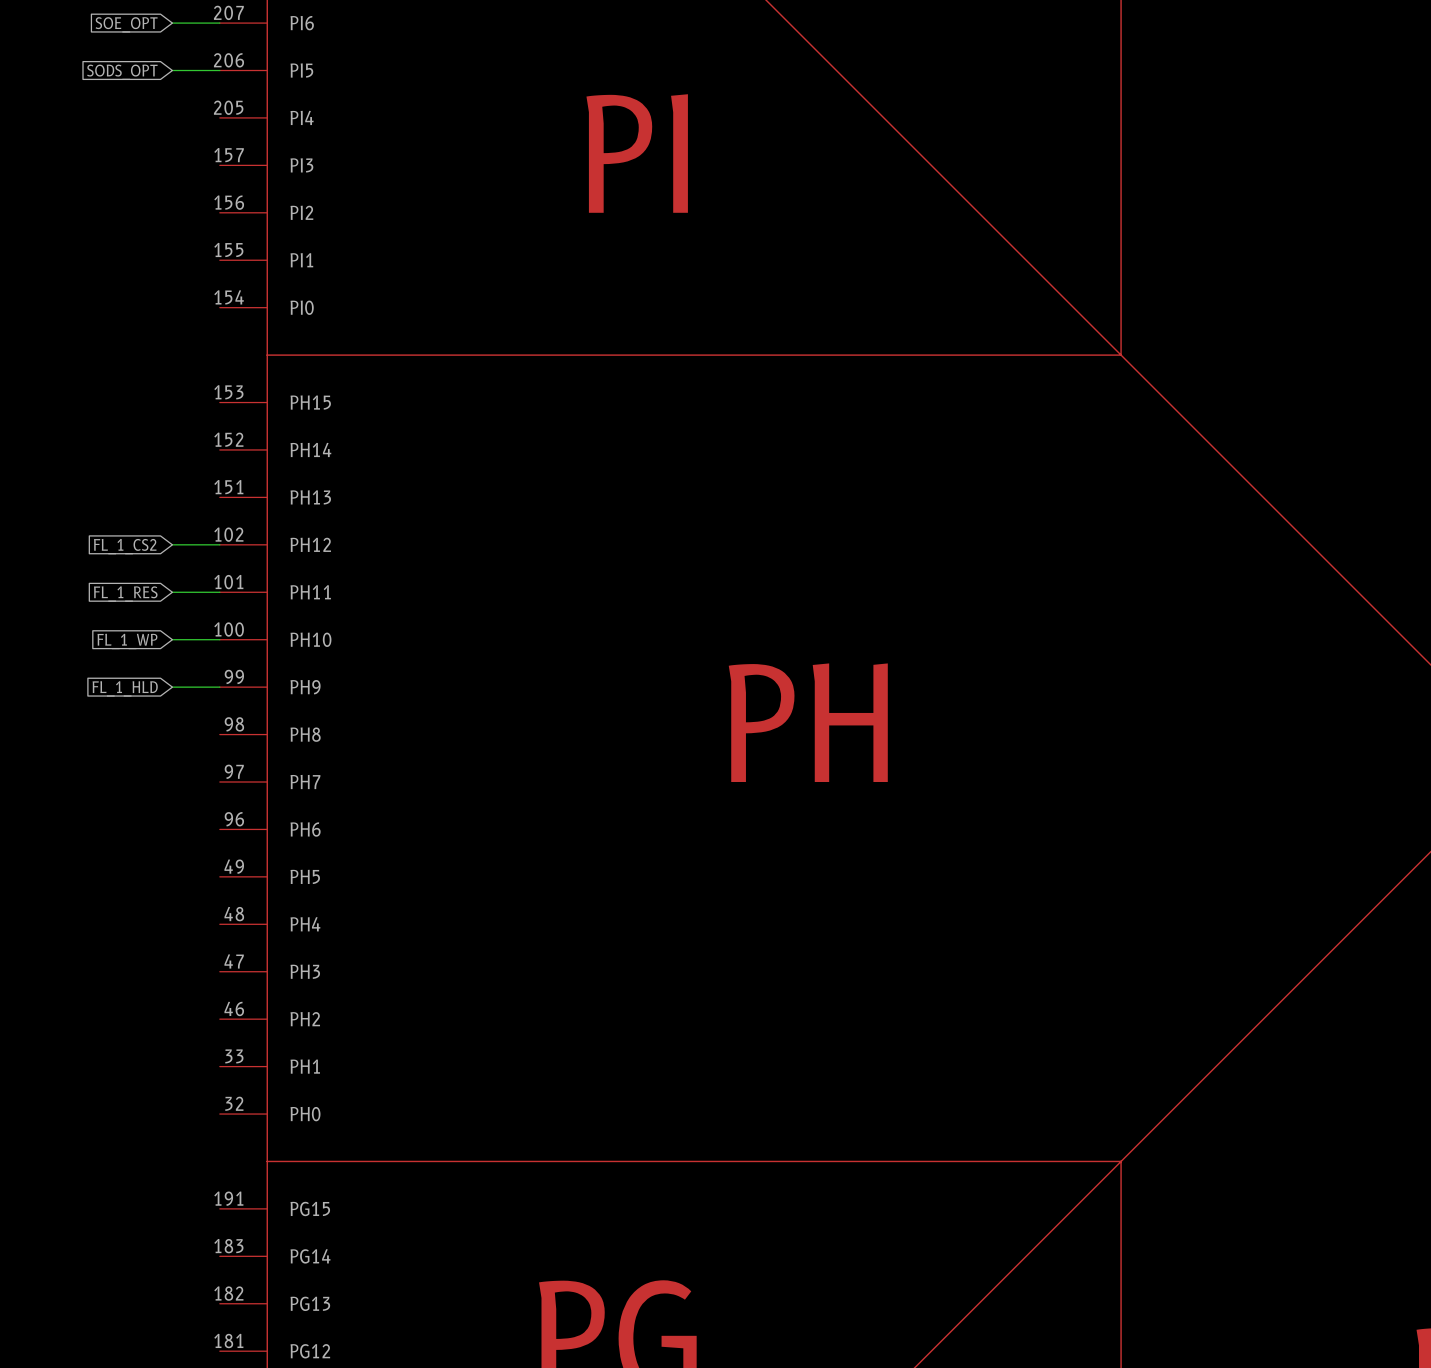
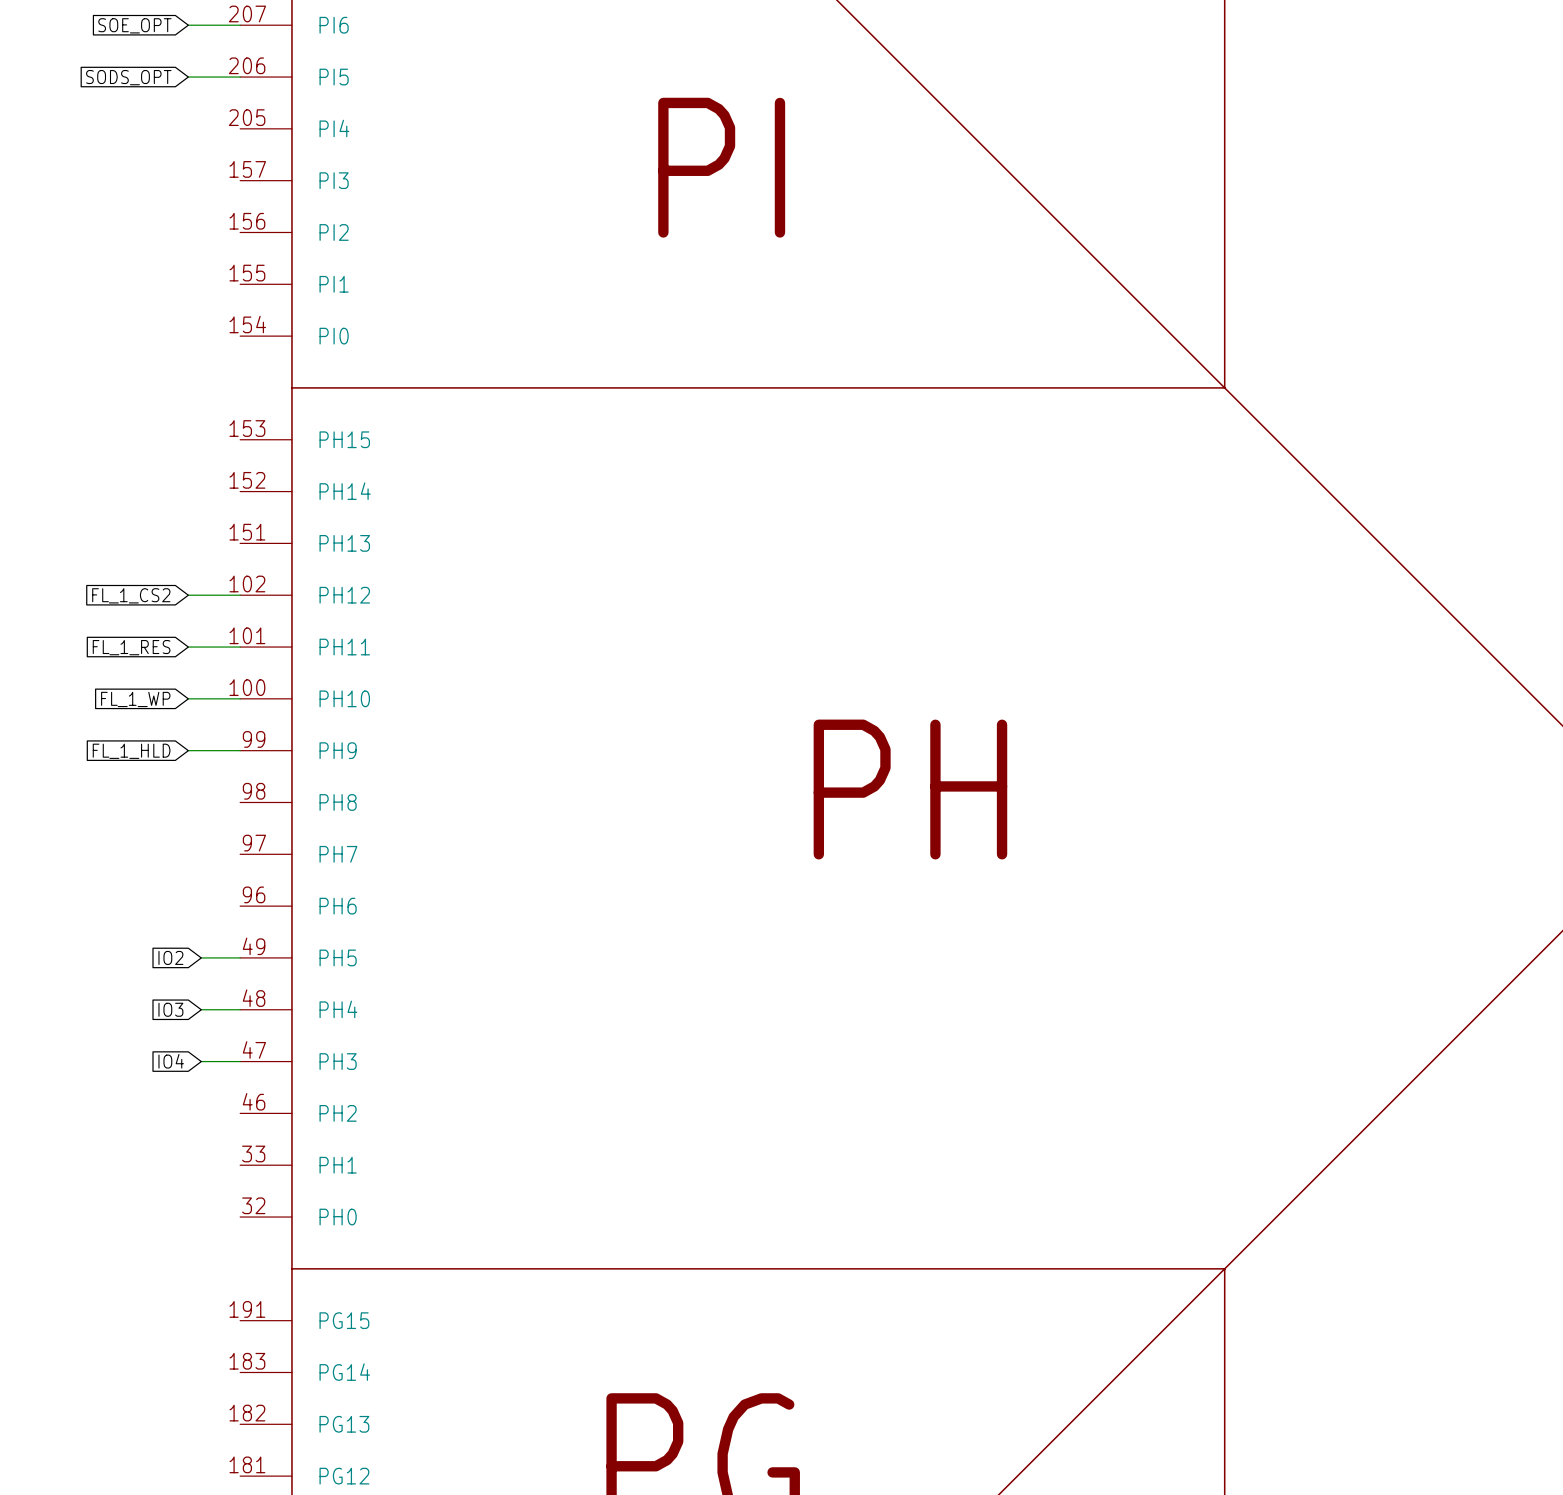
global label: none -> IO2 (170, 957)
wire: none -> (201, 957) (240, 957)
global label: none -> IO3 (170, 1009)
wire: none -> (201, 1009) (240, 1009)
global label: none -> IO4 (171, 1061)
wire: none -> (201, 1061) (240, 1061)

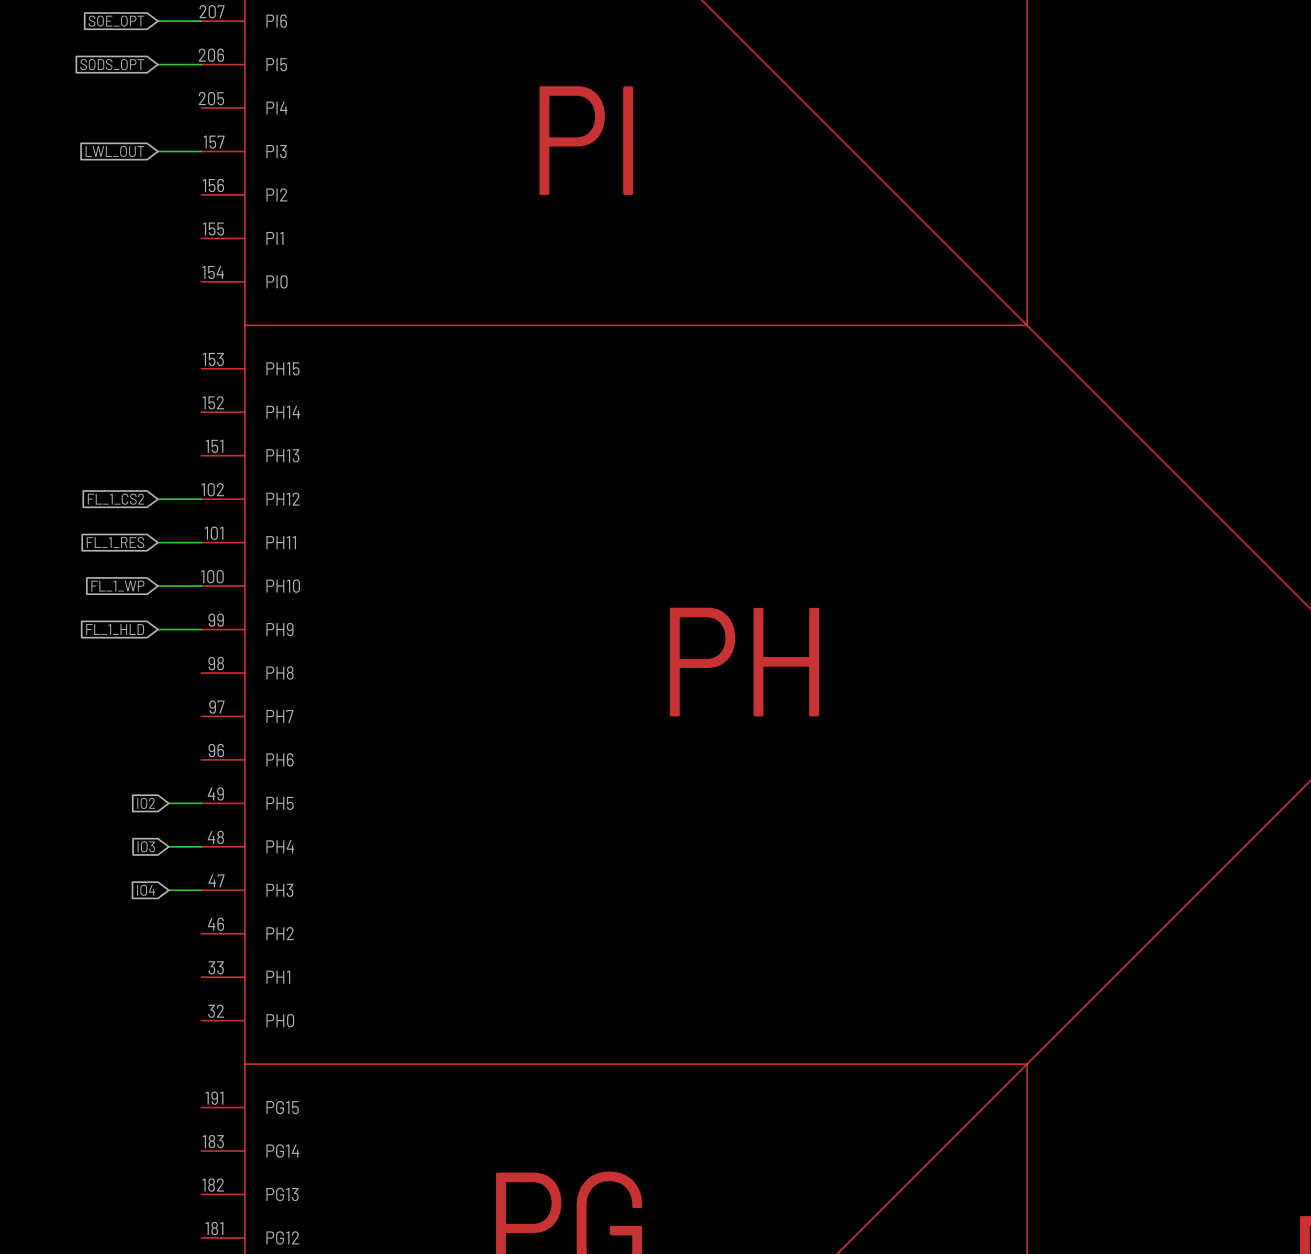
wire: none -> (157, 151) (201, 151)
global label: none -> LWL_OUT (114, 151)

